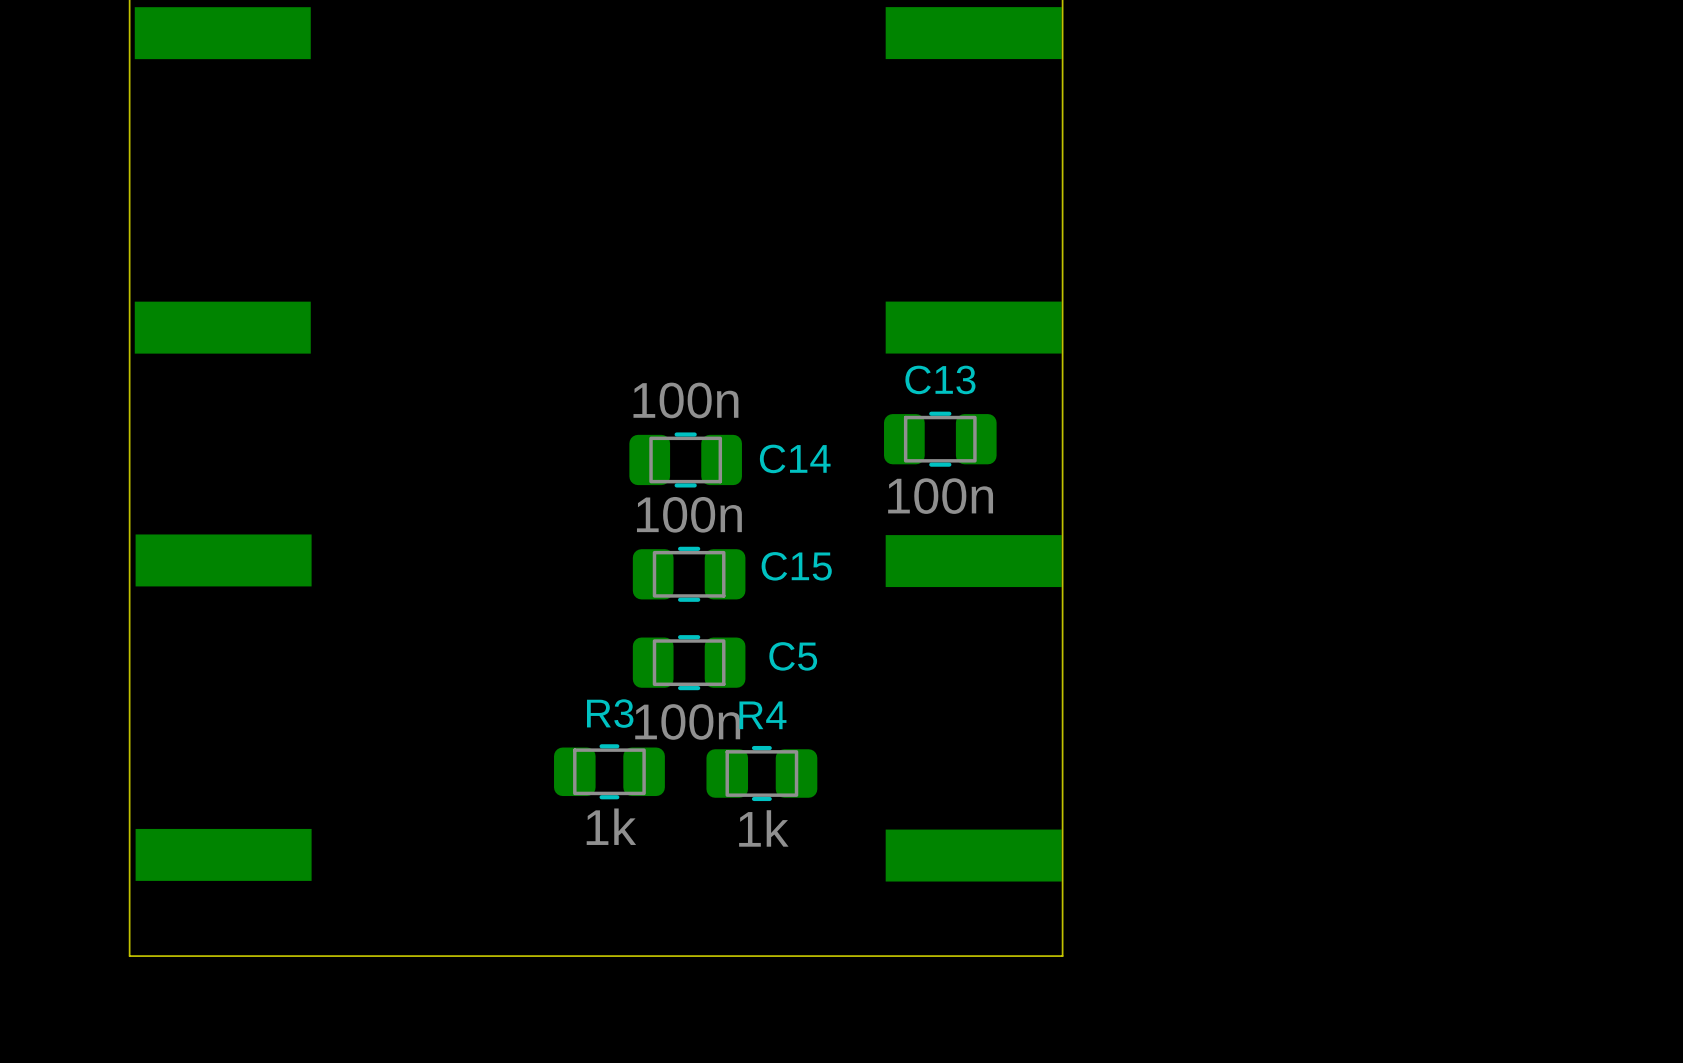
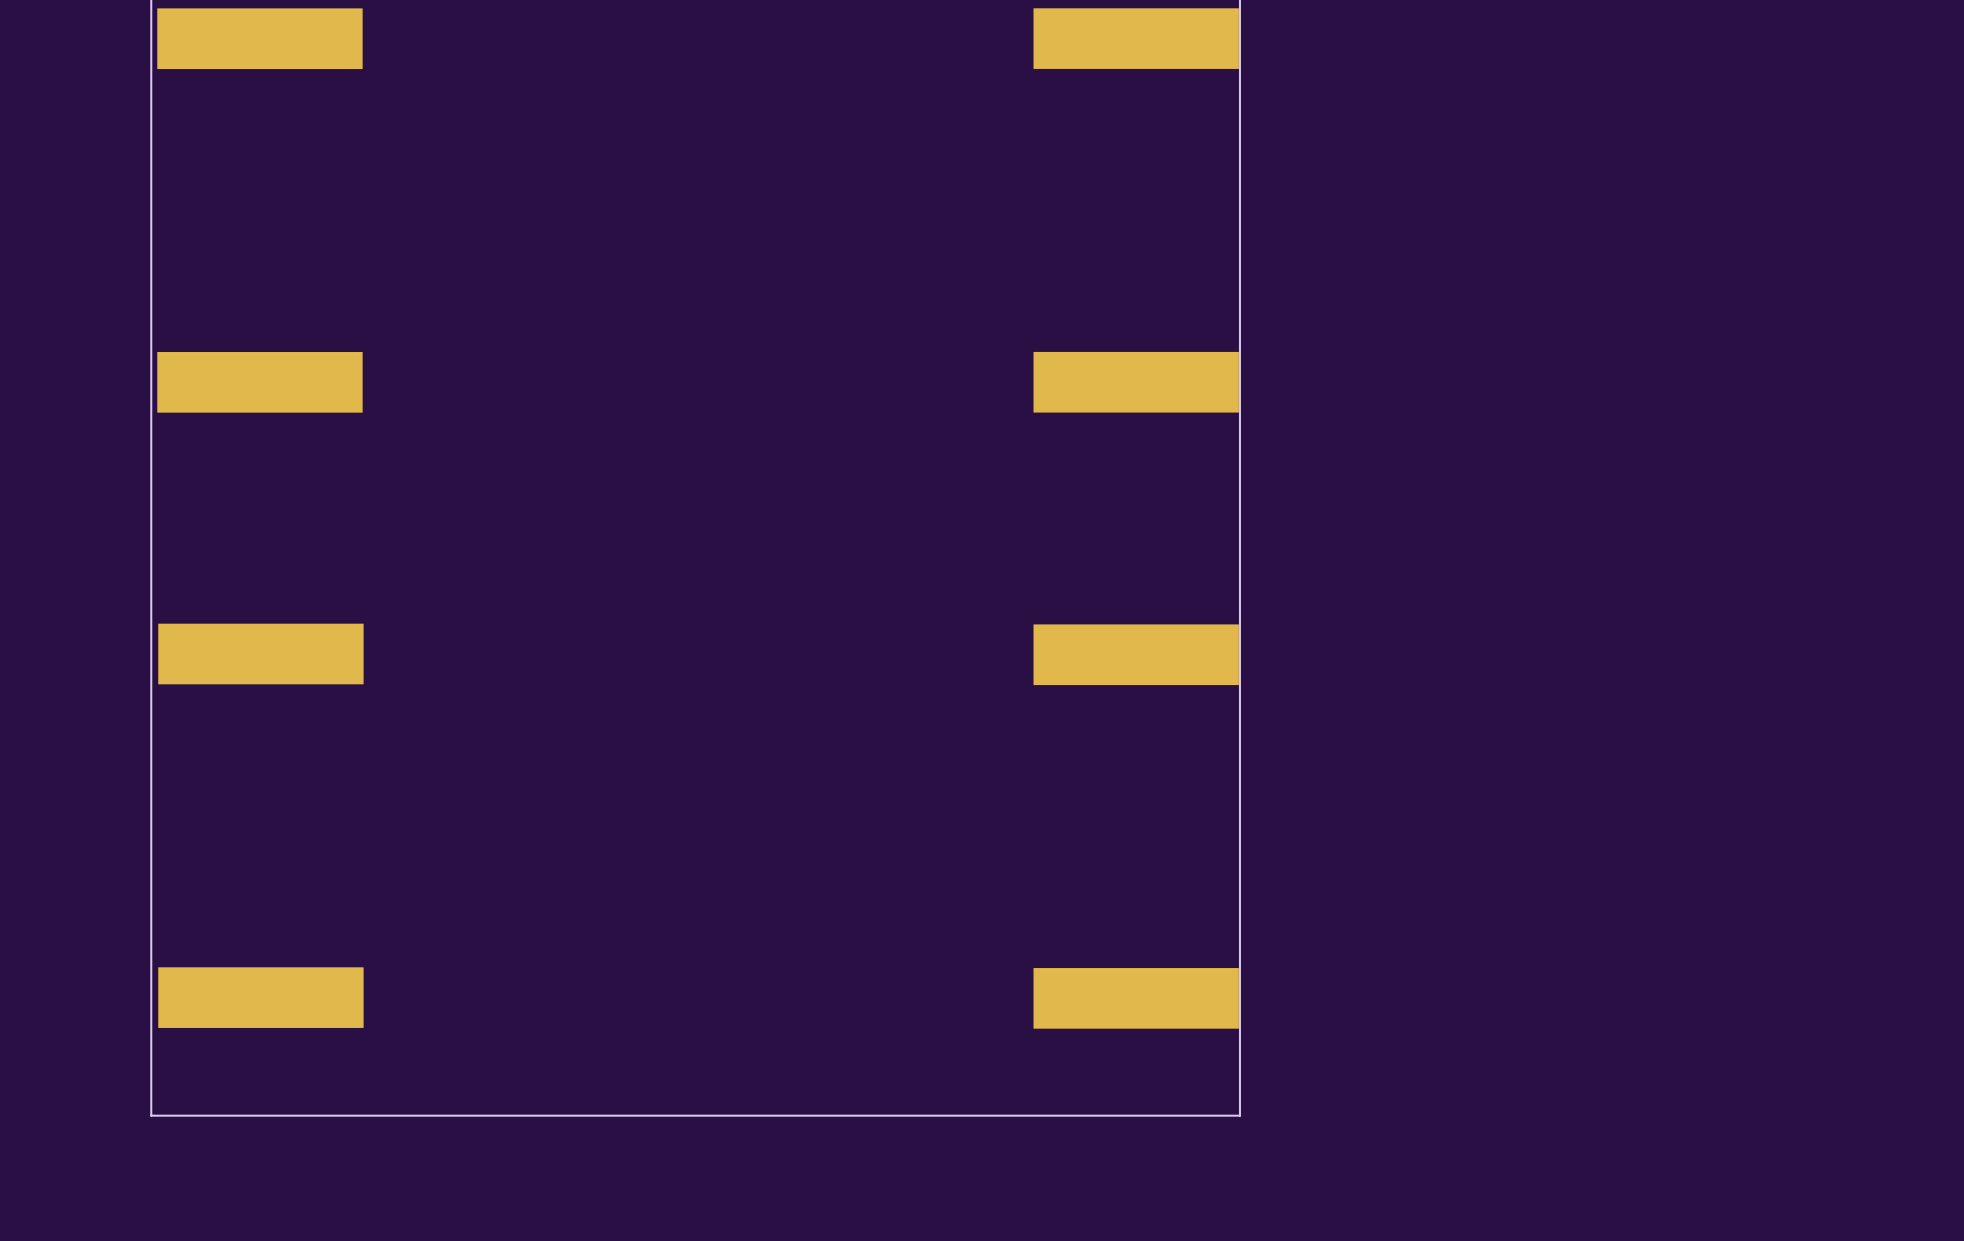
C13: 100n (940, 439) -> none
C14: 100n (685, 459) -> none
C15: 100n (689, 574) -> none
C5: 100n (689, 662) -> none
R3: 1k (609, 771) -> none
R4: 1k (761, 773) -> none

